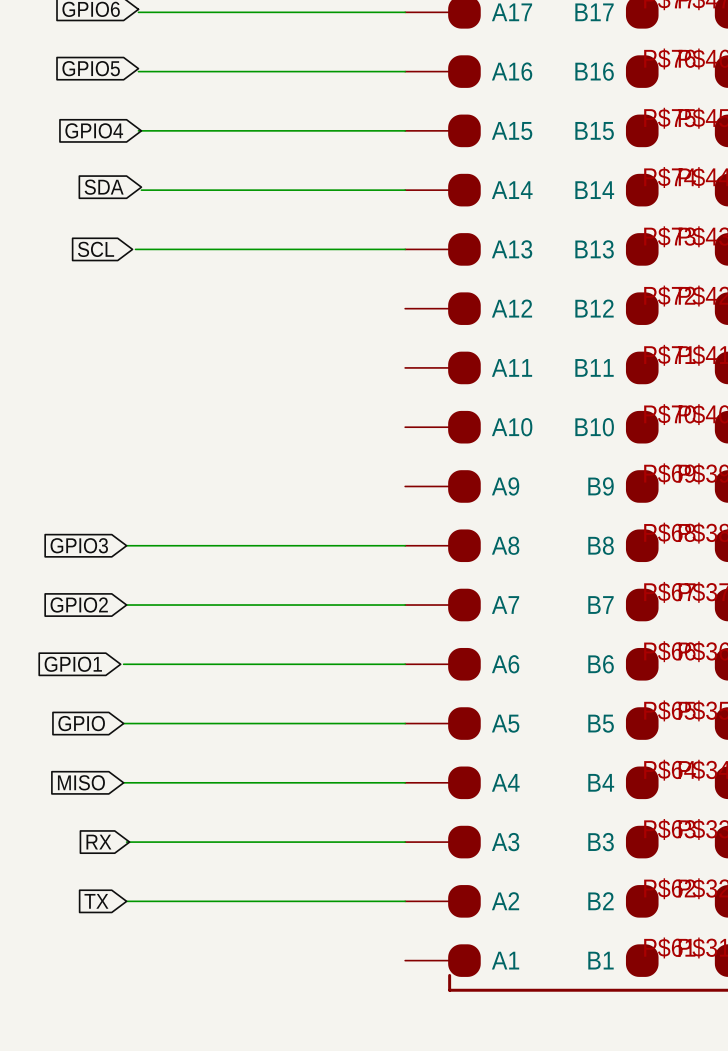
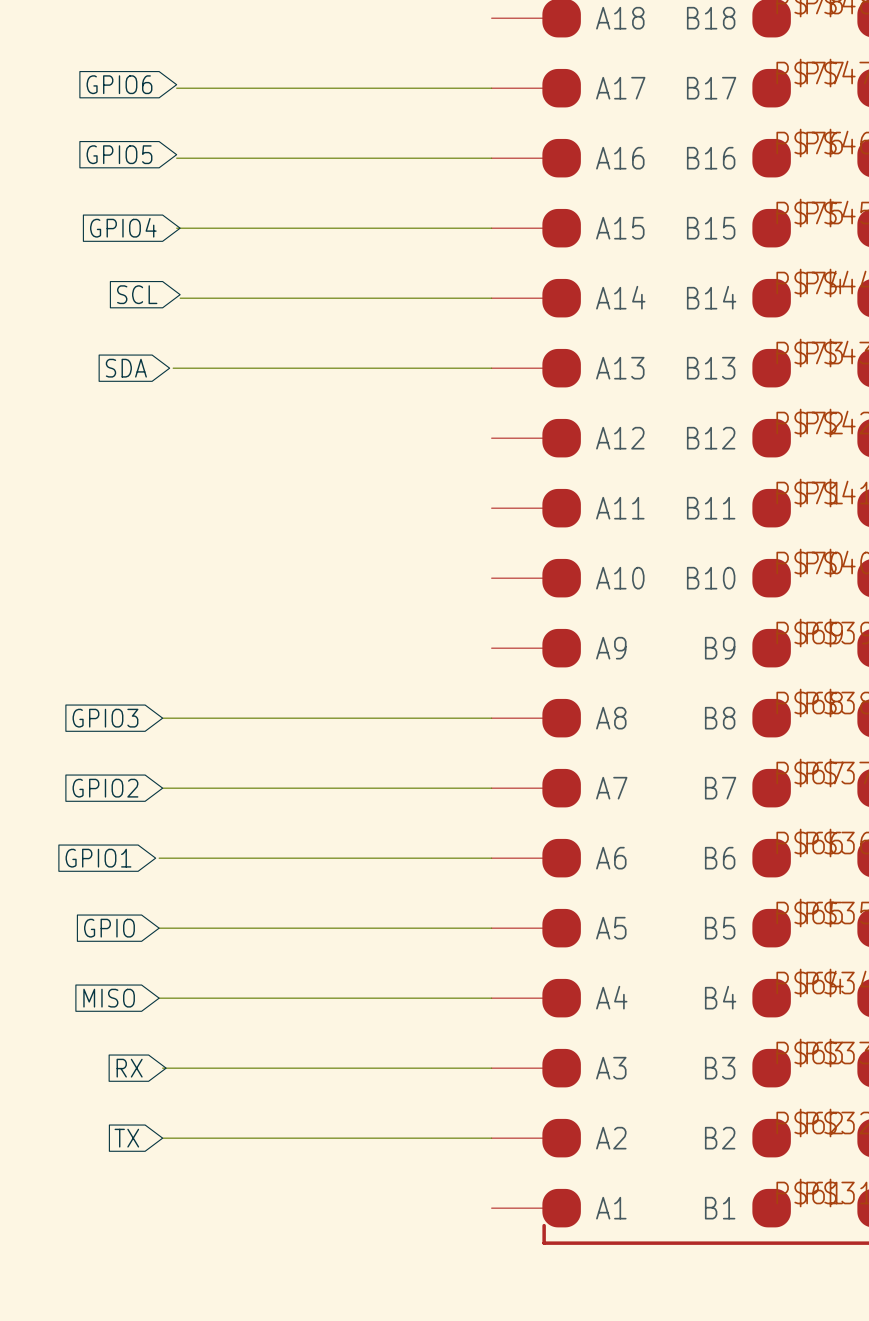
global label: SDA (104, 187) -> SCL (137, 294)
global label: SCL (96, 249) -> SDA (126, 368)

